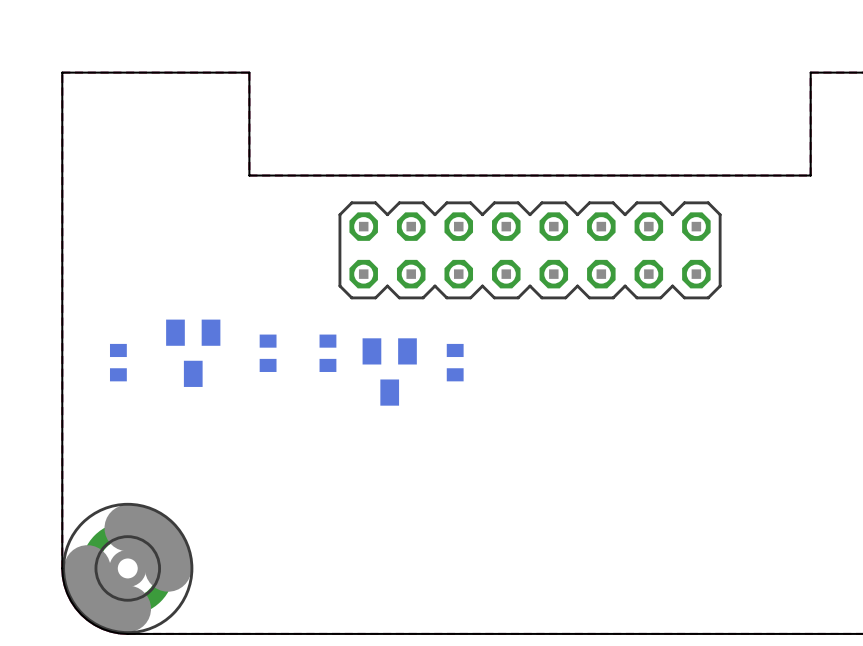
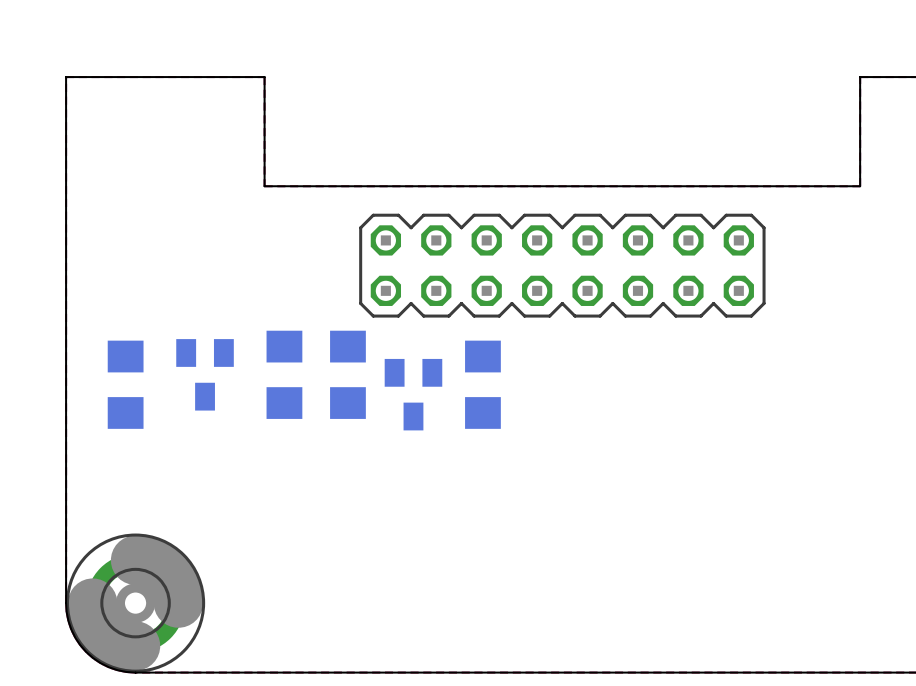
part footprint: [259, 334, 277, 372] -> [266, 330, 303, 419]
part footprint: [319, 334, 337, 372] -> [330, 330, 366, 419]
part footprint: [109, 343, 127, 382] -> [107, 340, 144, 429]
part footprint: [446, 343, 464, 382] -> [465, 340, 501, 429]

